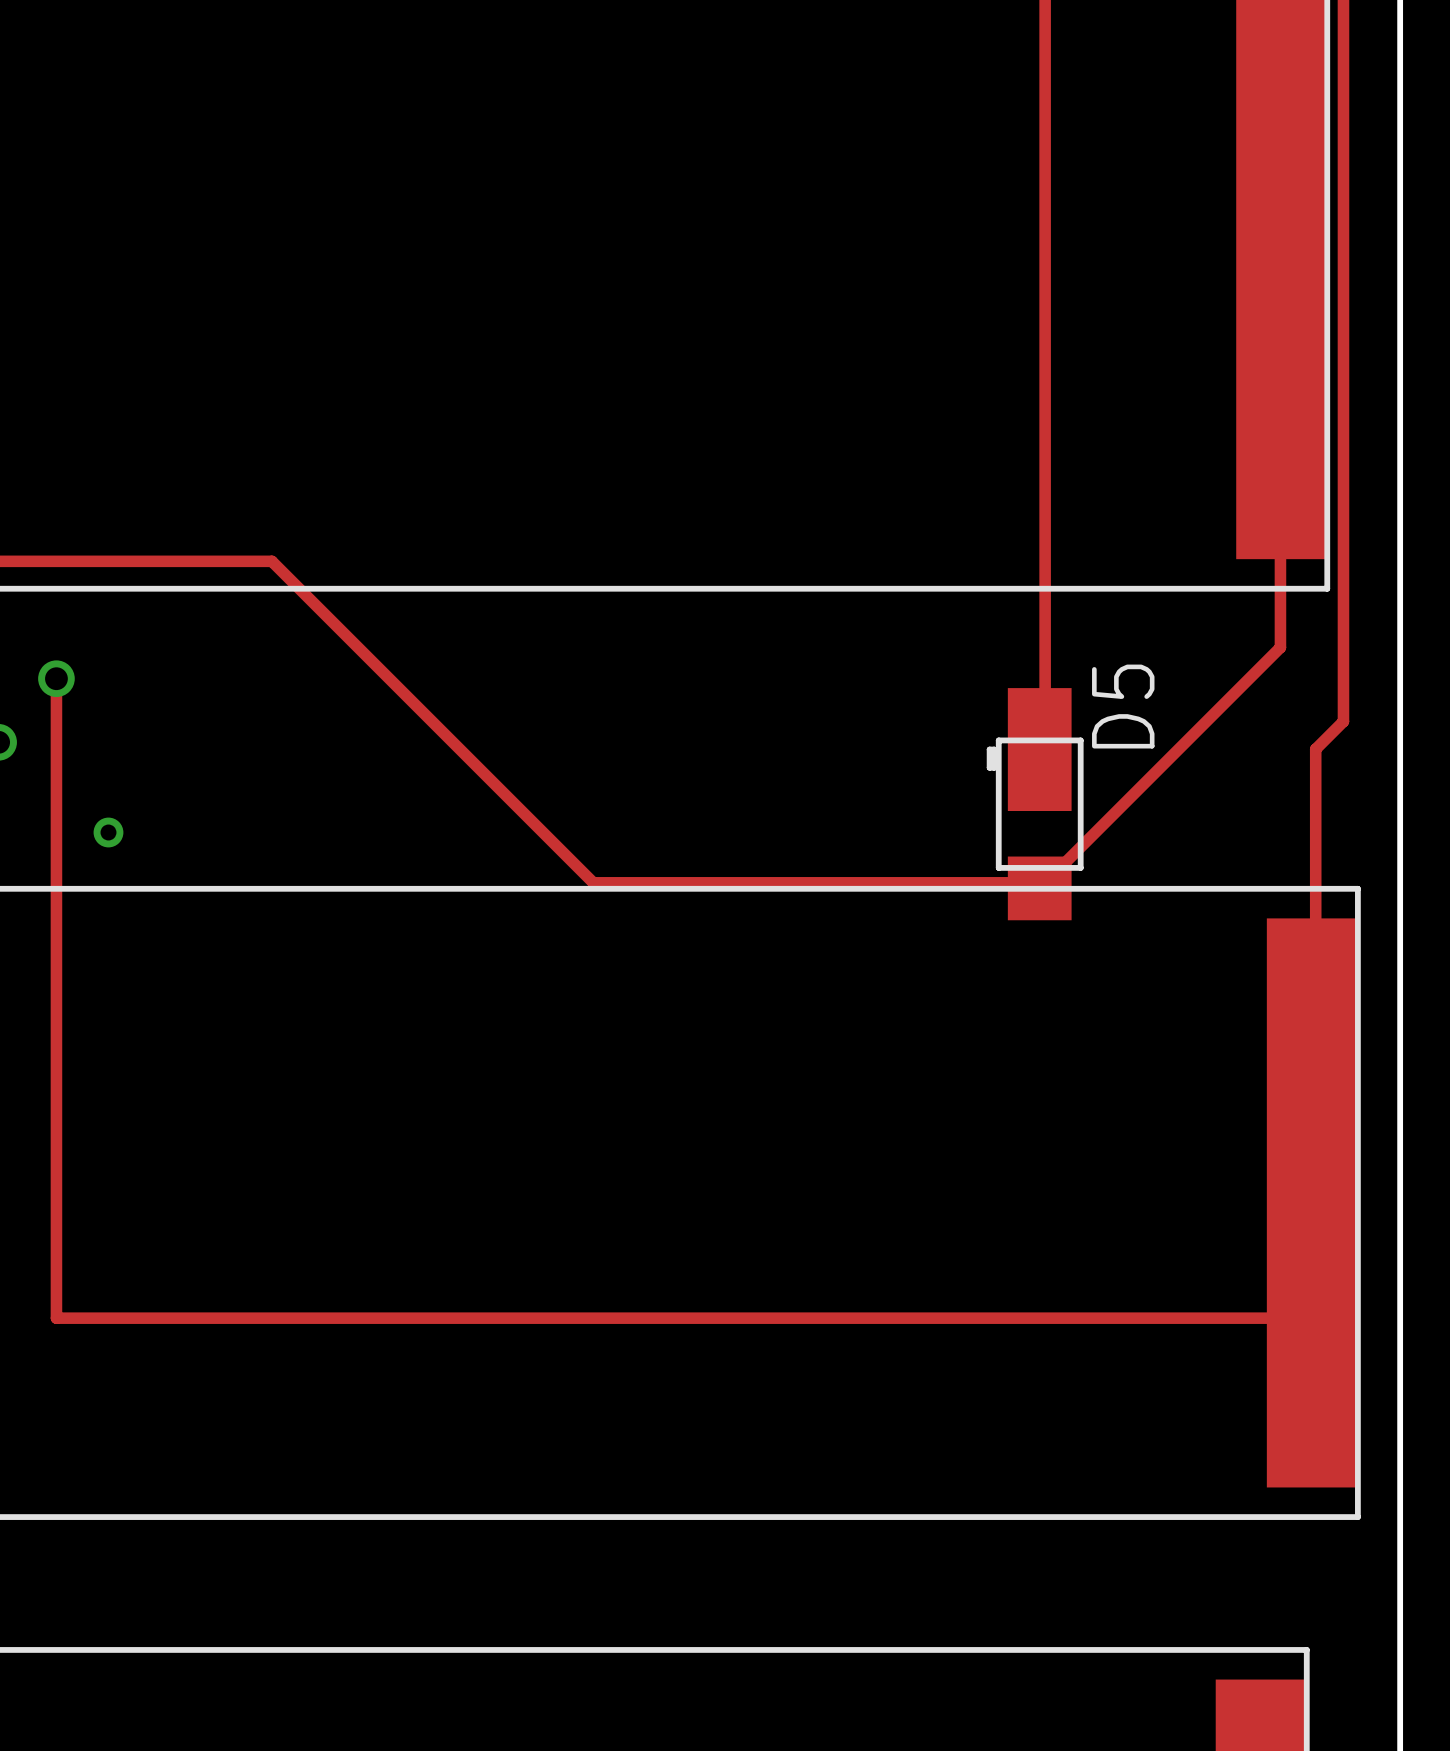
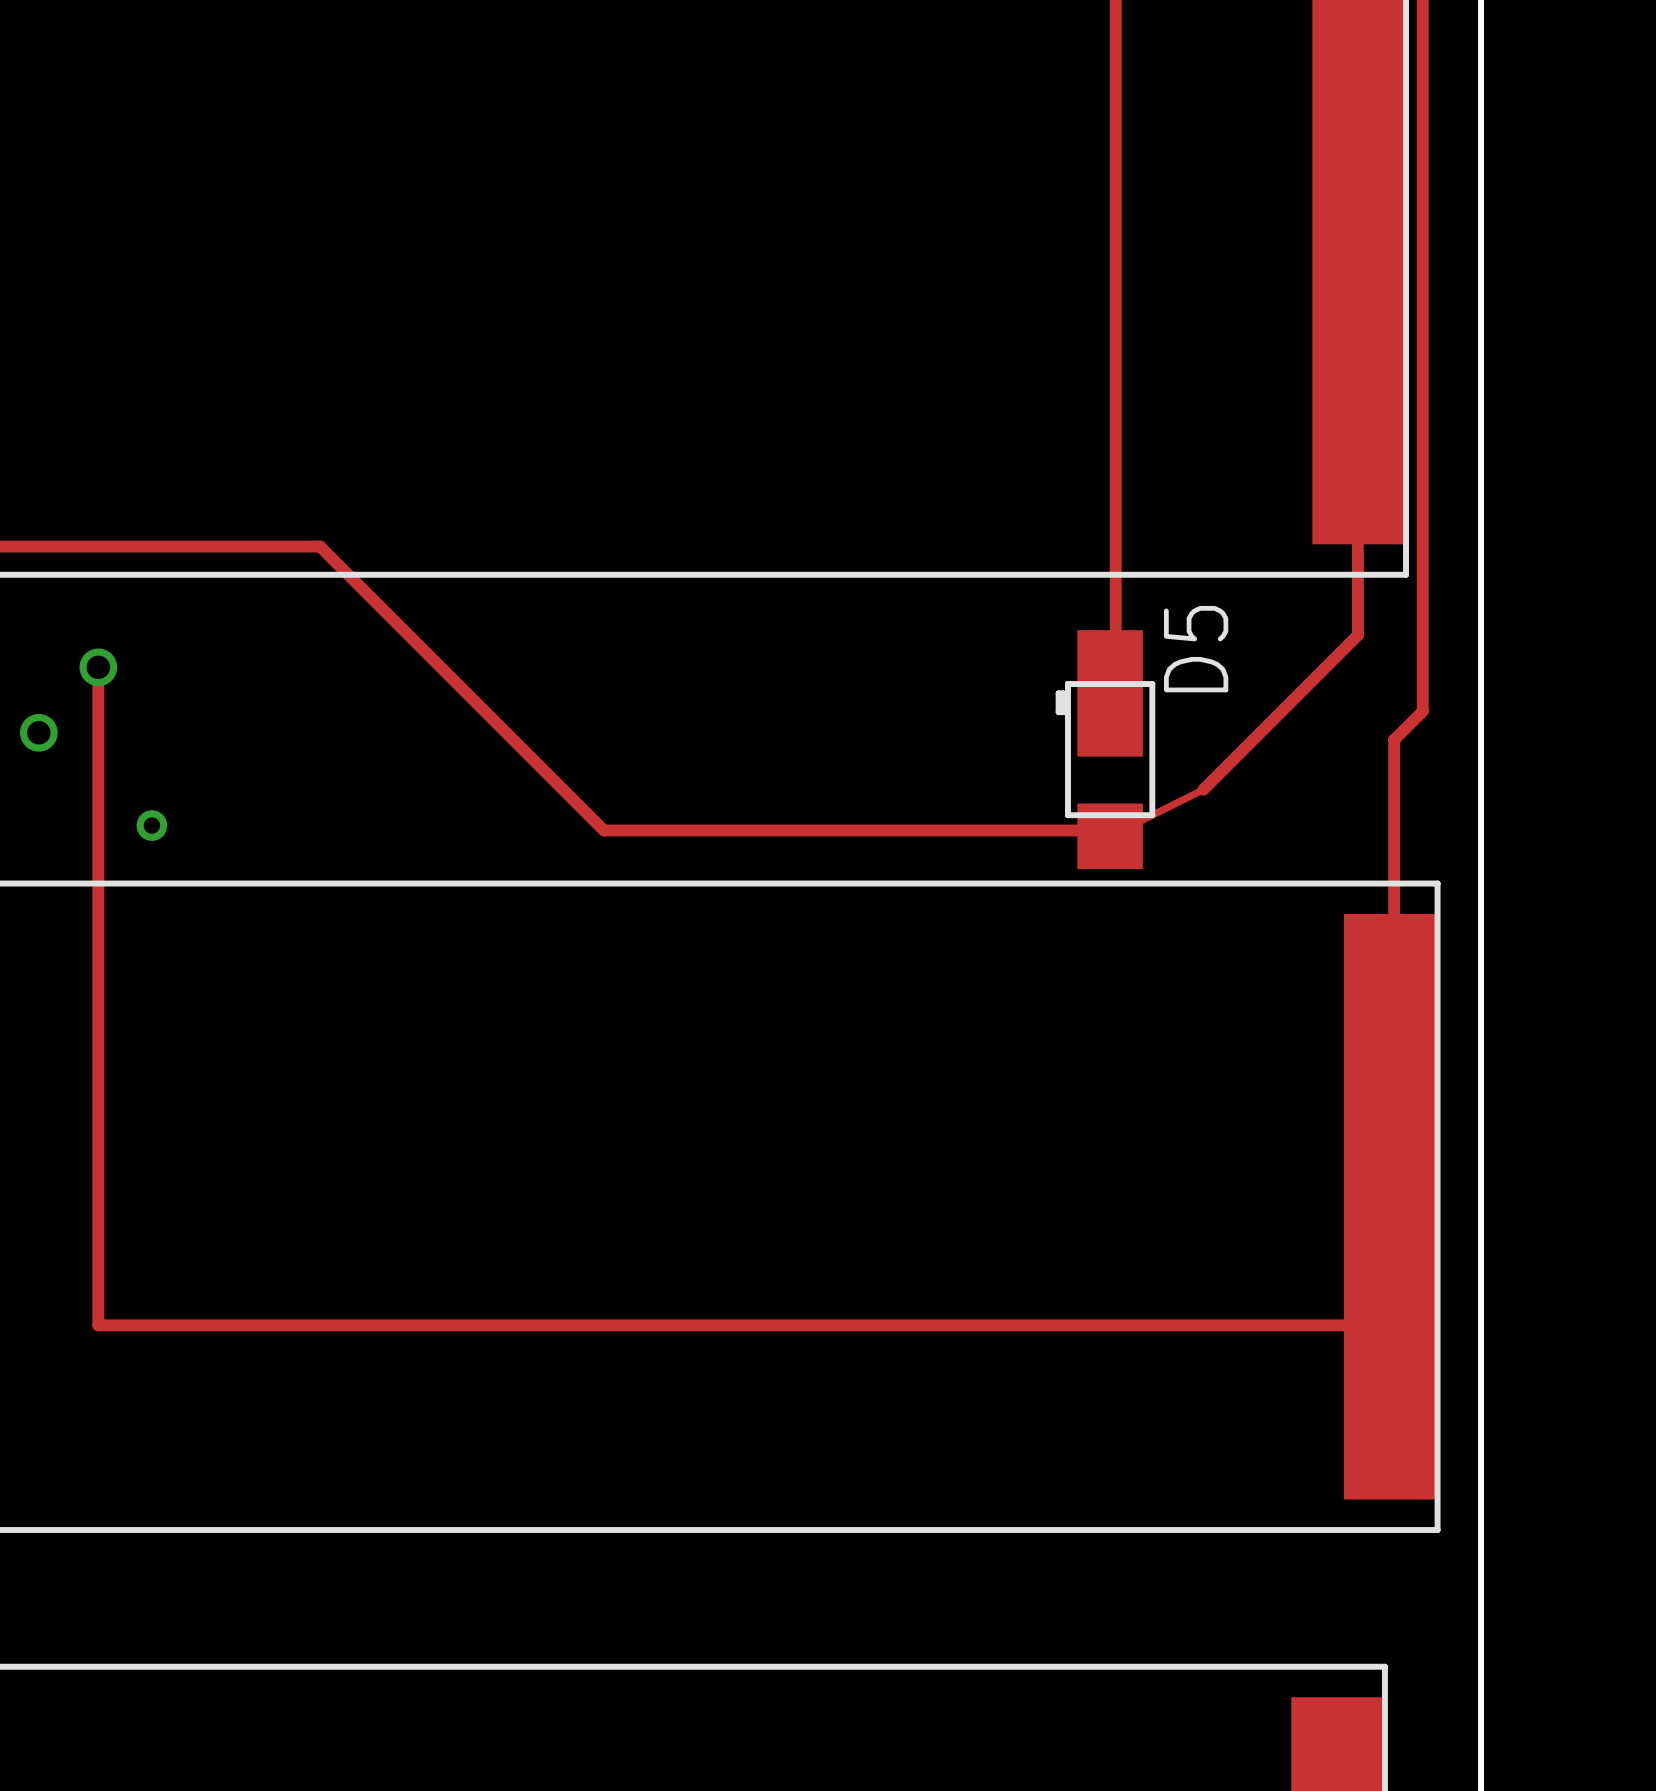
track: (1130, 797) (1045, 882) -> (1203, 789) (1110, 836)
D5 position: (1035, 804) -> (1105, 749)
track: (547, 837) (593, 882) (1045, 882) -> (604, 830) (1115, 830)

